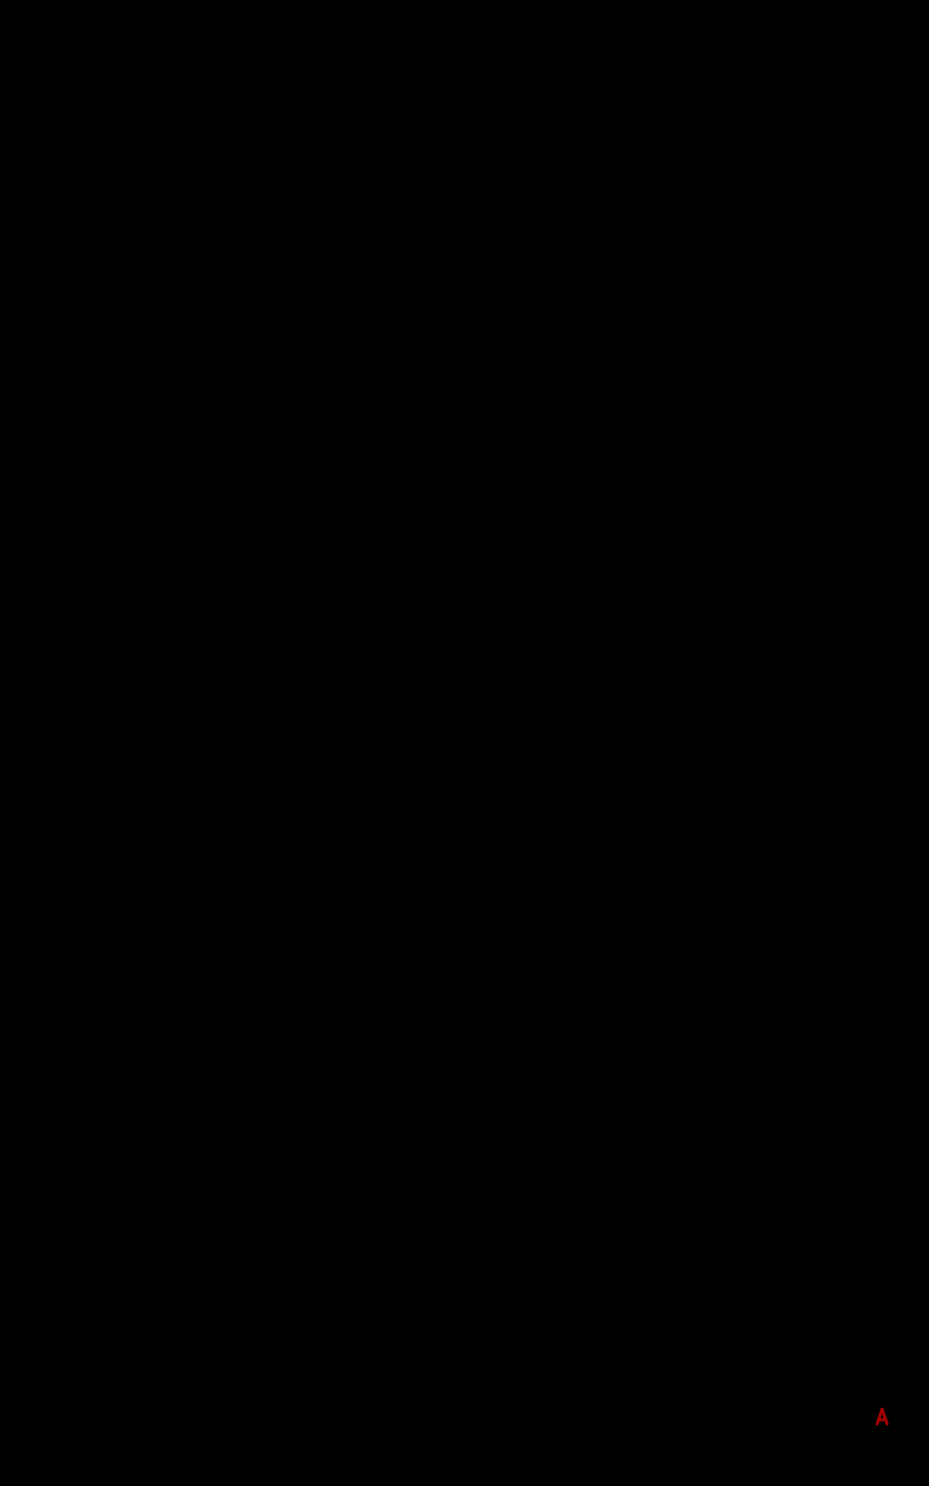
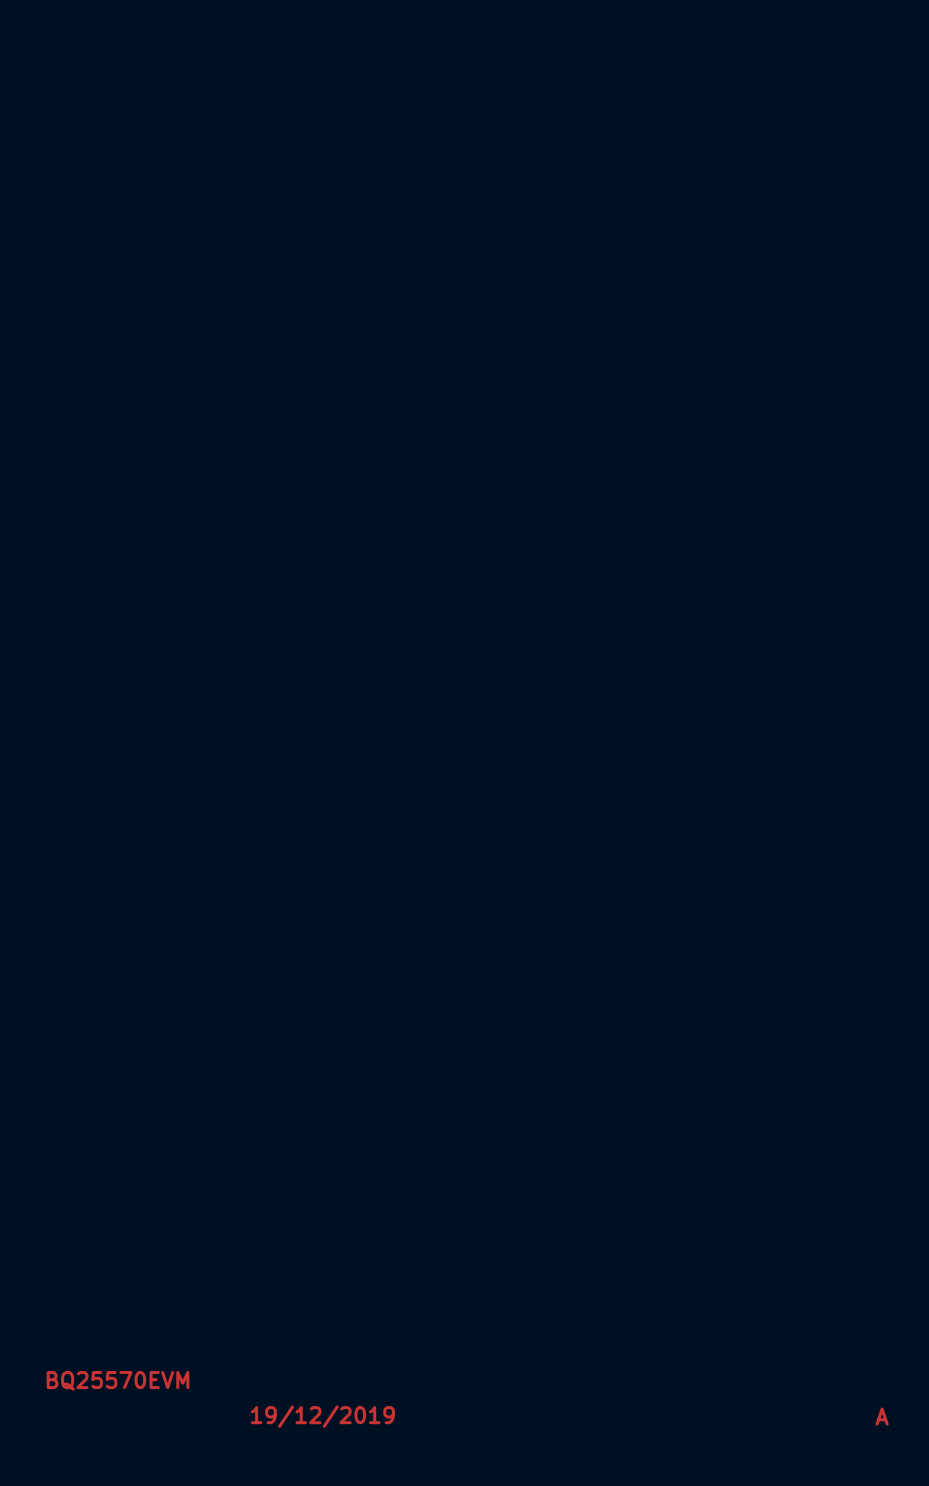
text: none -> BQ25570EVM (118, 1380)
text: none -> 19/12/2019 (322, 1416)

